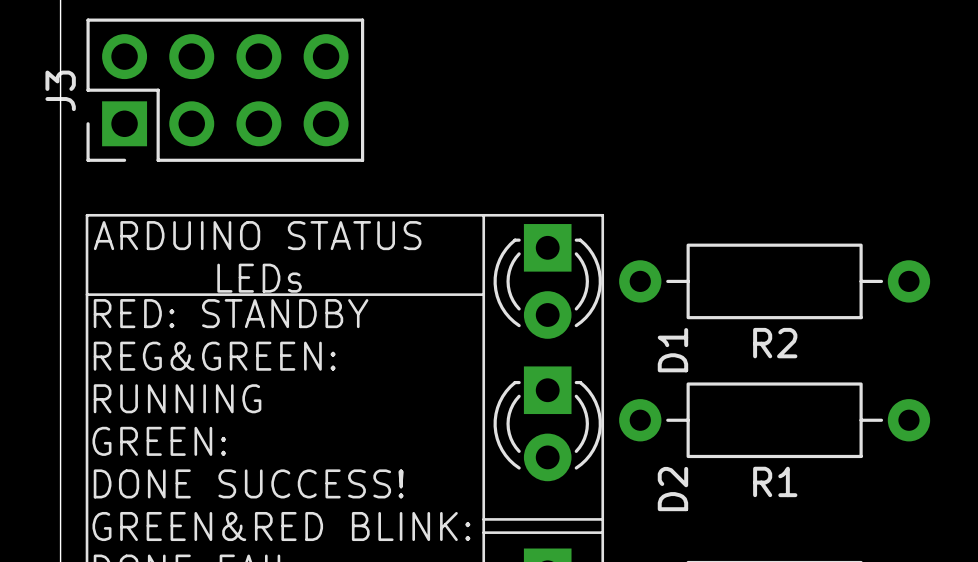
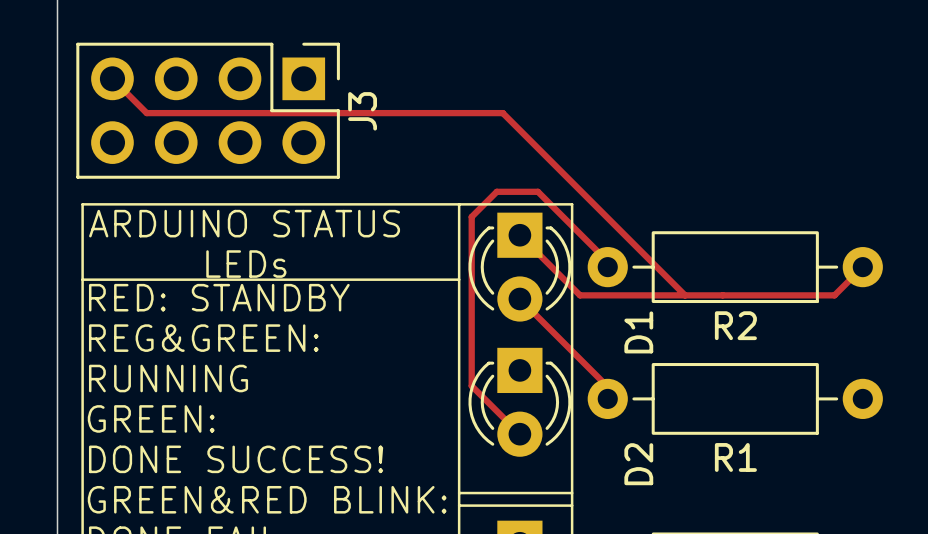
track: none -> (112, 78) (146, 113) (502, 113) (685, 295)
J3 rotation: 0° (225, 90) -> 180° (208, 110)
track: none -> (519, 235) (580, 295) (834, 295) (862, 267)
track: none -> (607, 267) (607, 261) (537, 191) (496, 191) (471, 216) (471, 385) (519, 434)
track: none -> (519, 299) (607, 386) (607, 398)

